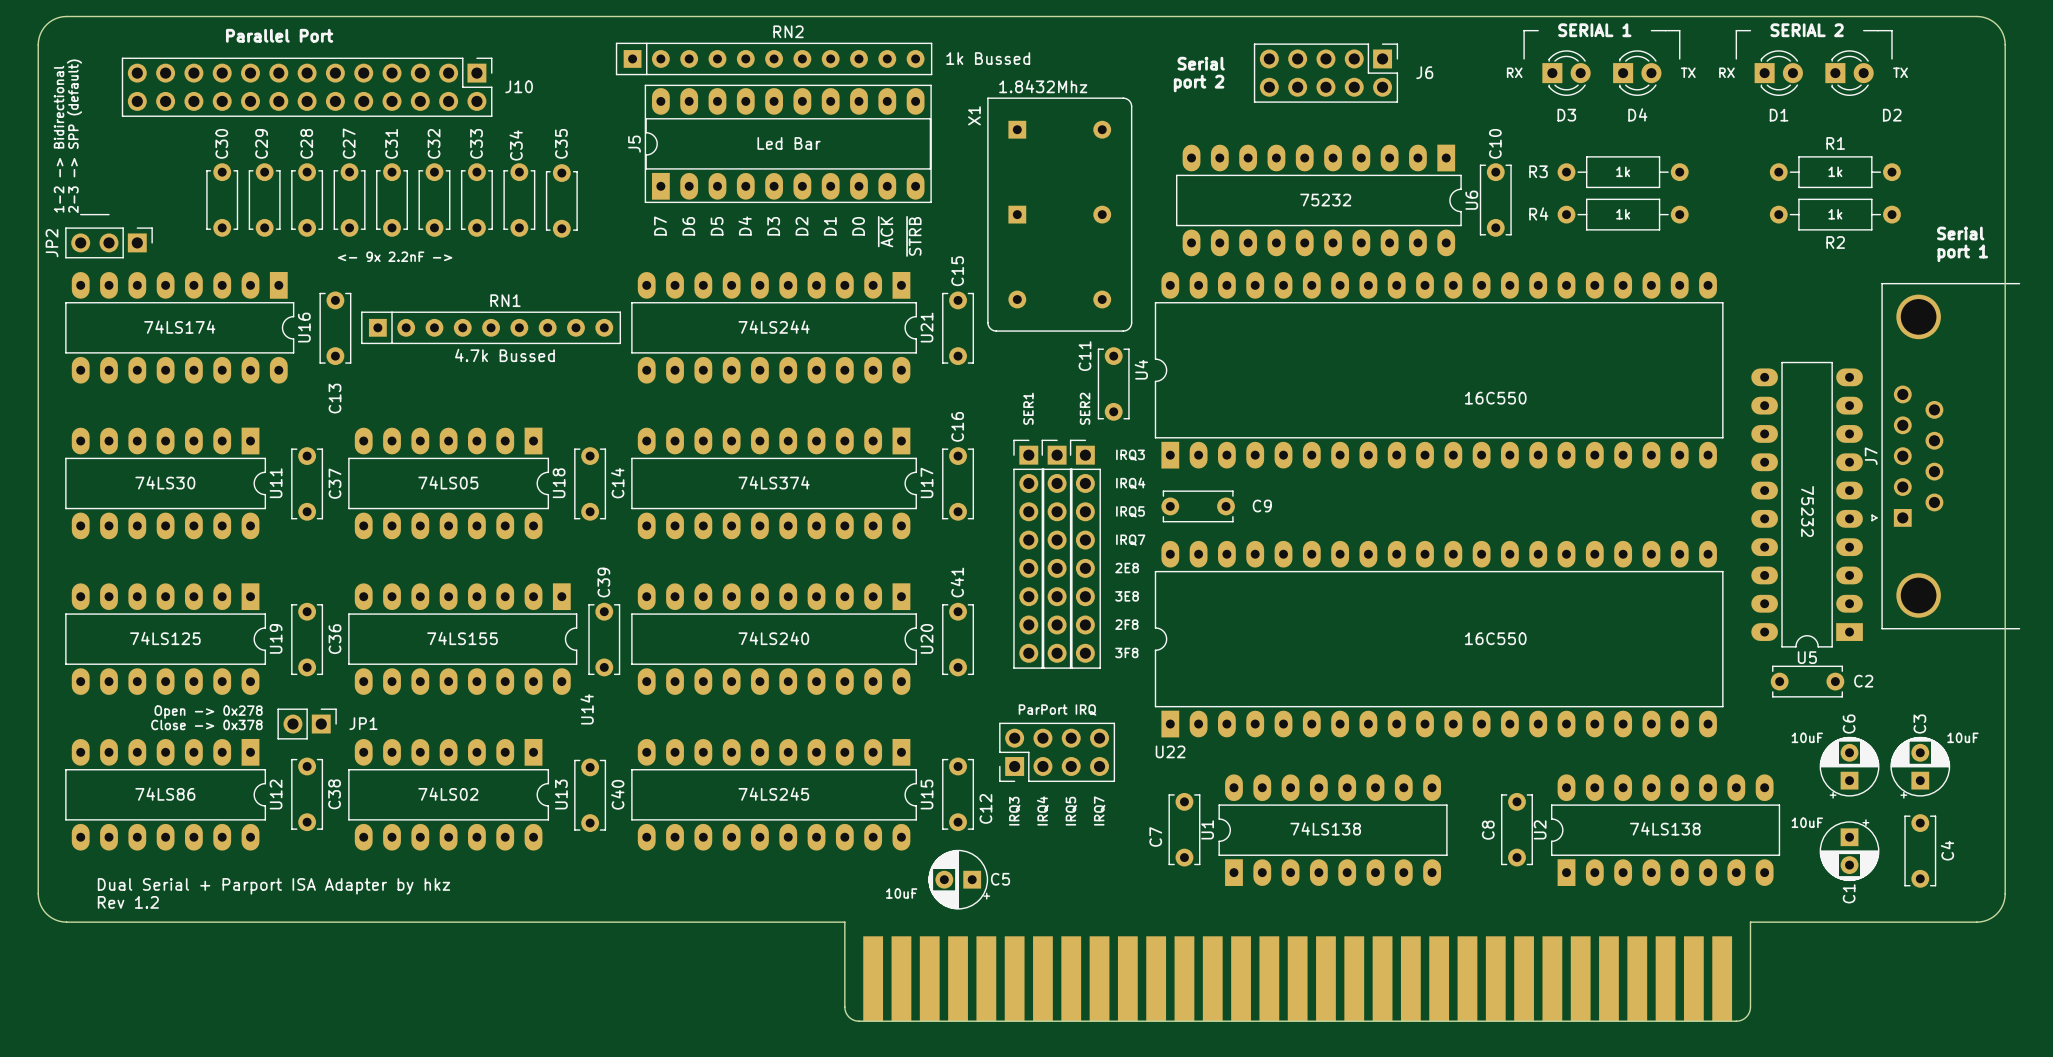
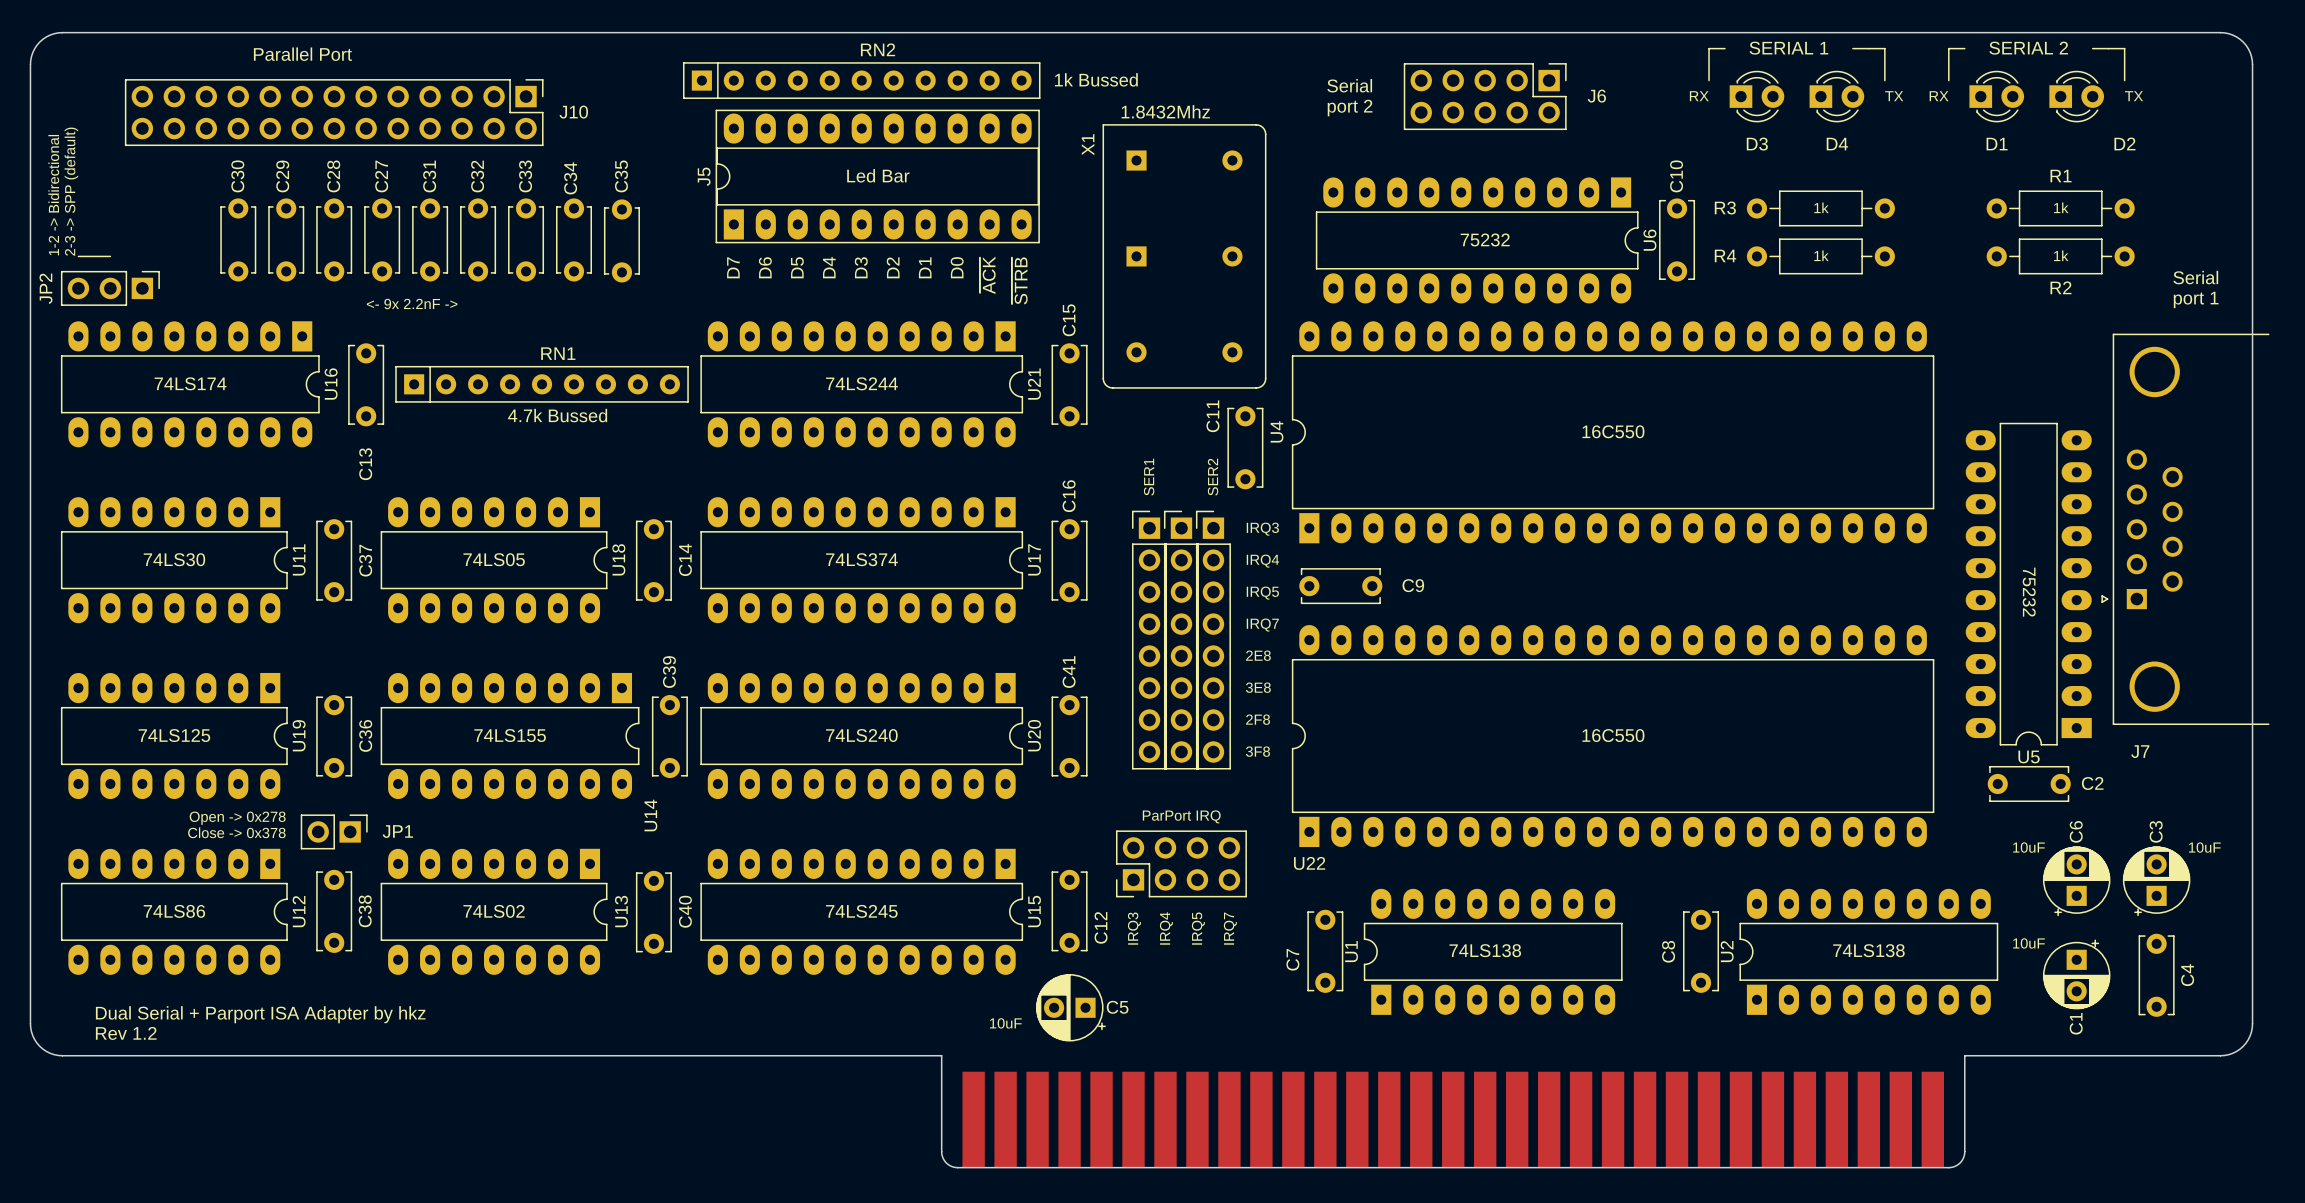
text position: 16C550 (1495, 398) -> 16C550 (1613, 431)
J7 name rotation: 0° (1871, 456) -> 90° clockwise (2140, 751)
J7 name position: J7 (1871, 456) -> J7 (2140, 751)
text position: 16C550 (1495, 638) -> 16C550 (1613, 735)

